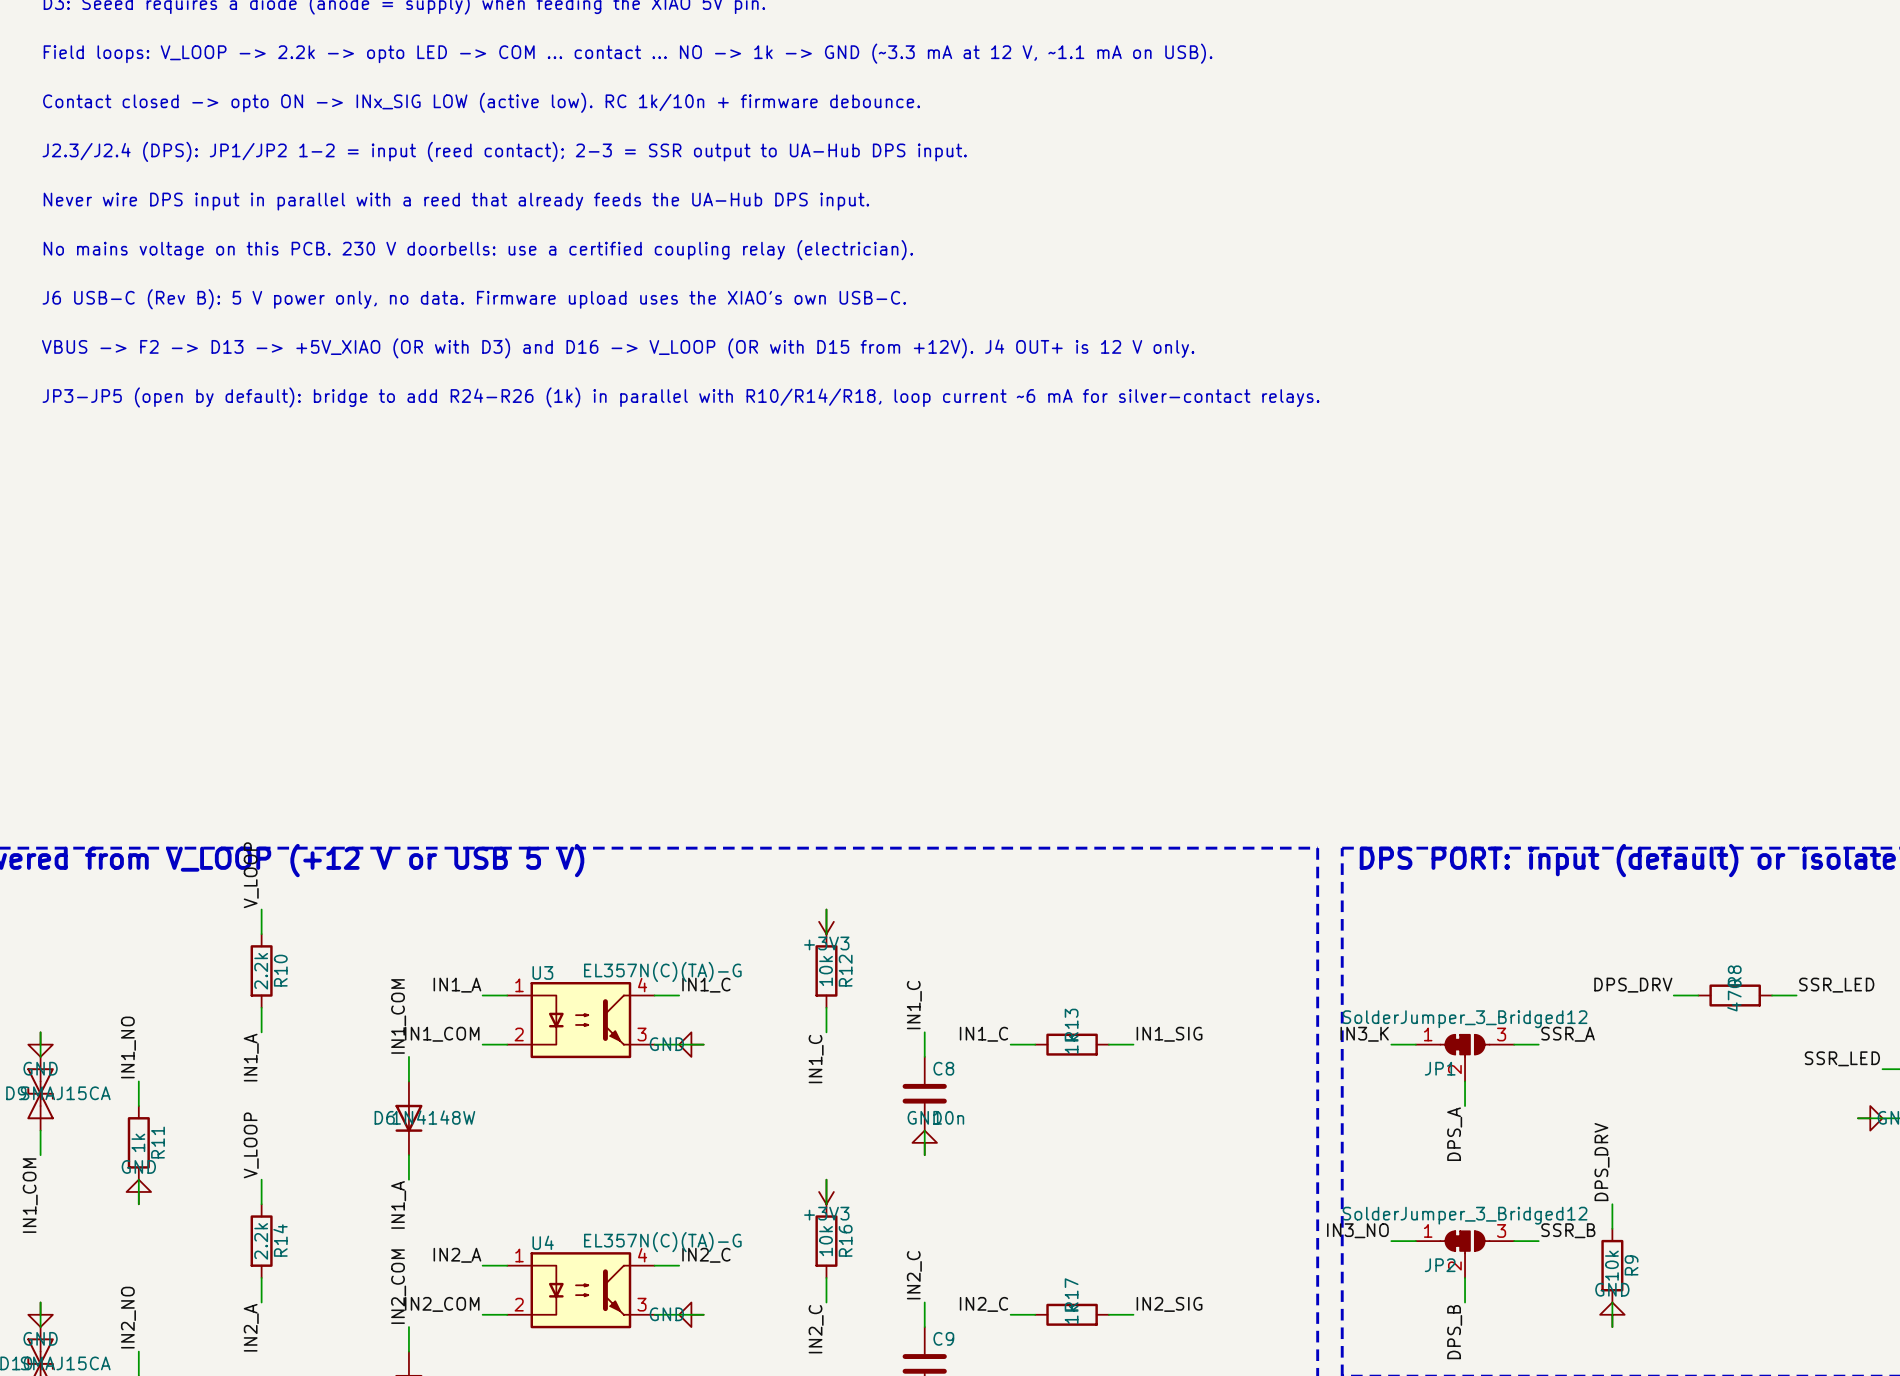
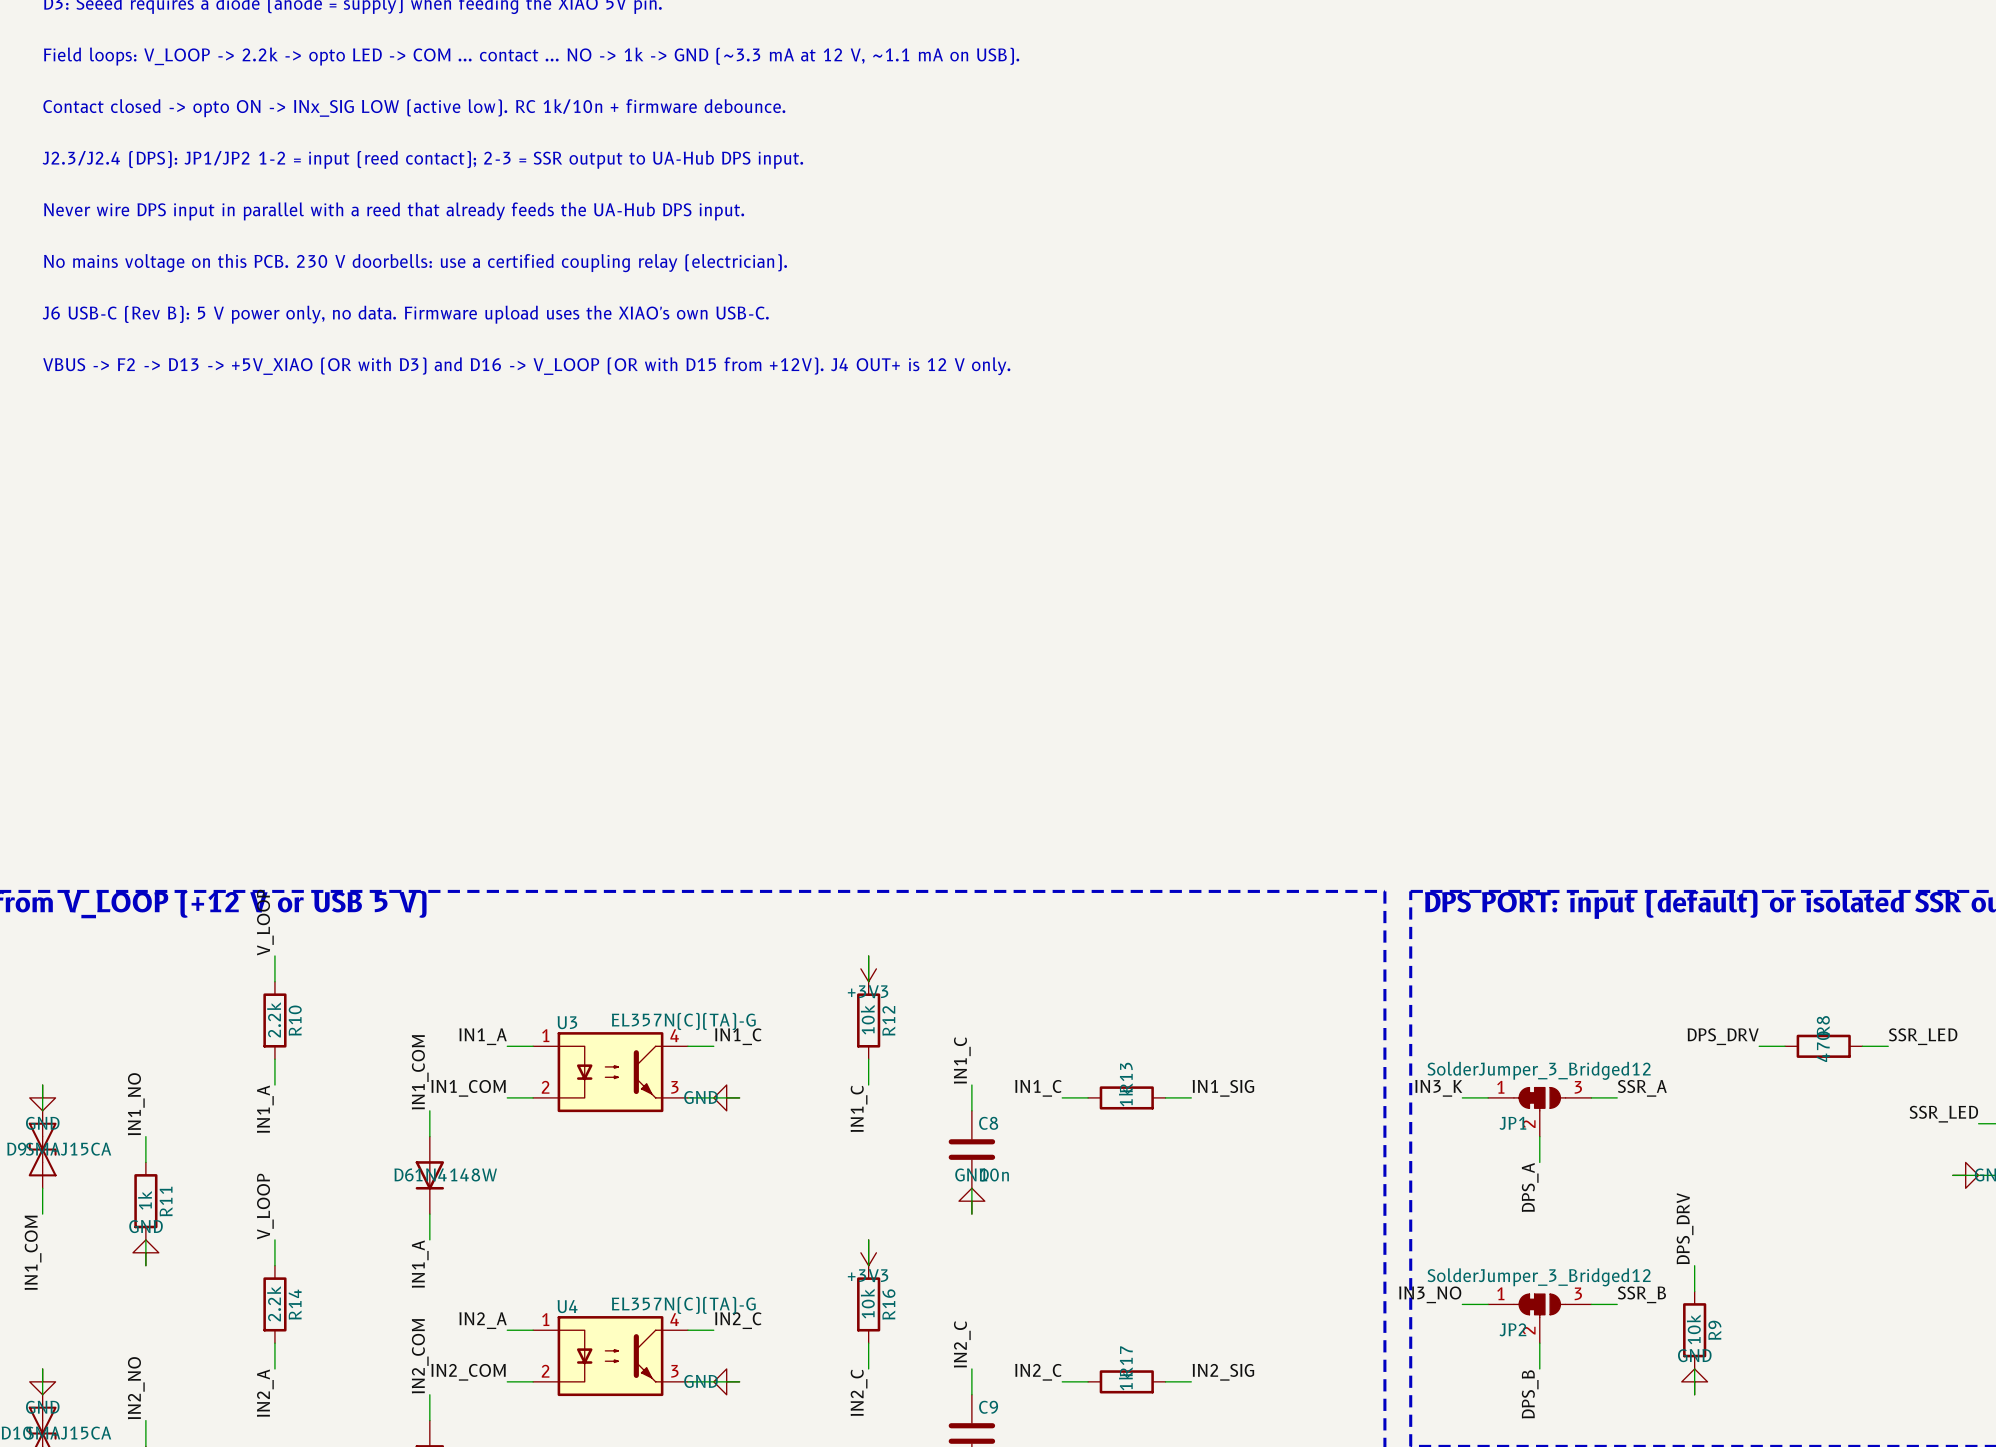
text: JP3-JP5 (open by default): bridge to add R24-R26 (1k) in parallel with R10/R14/R18, loop current ~6 mA for silver-contact relays. (680, 397) -> none

